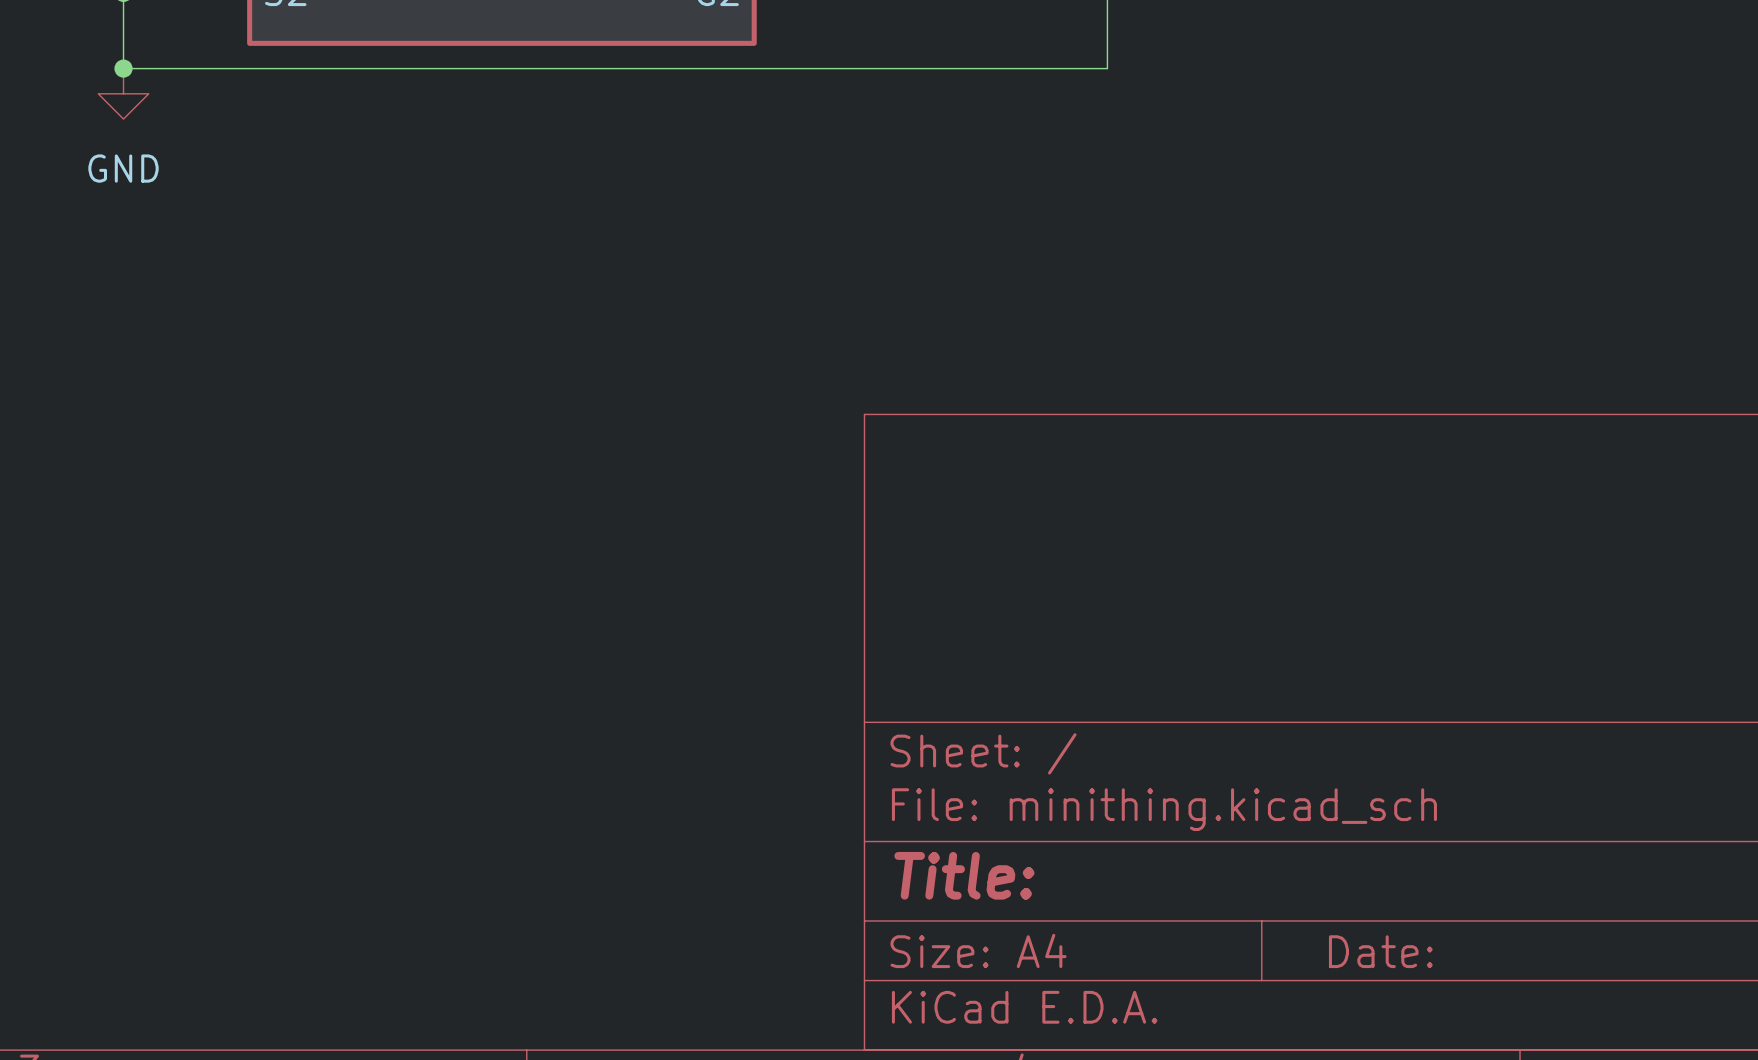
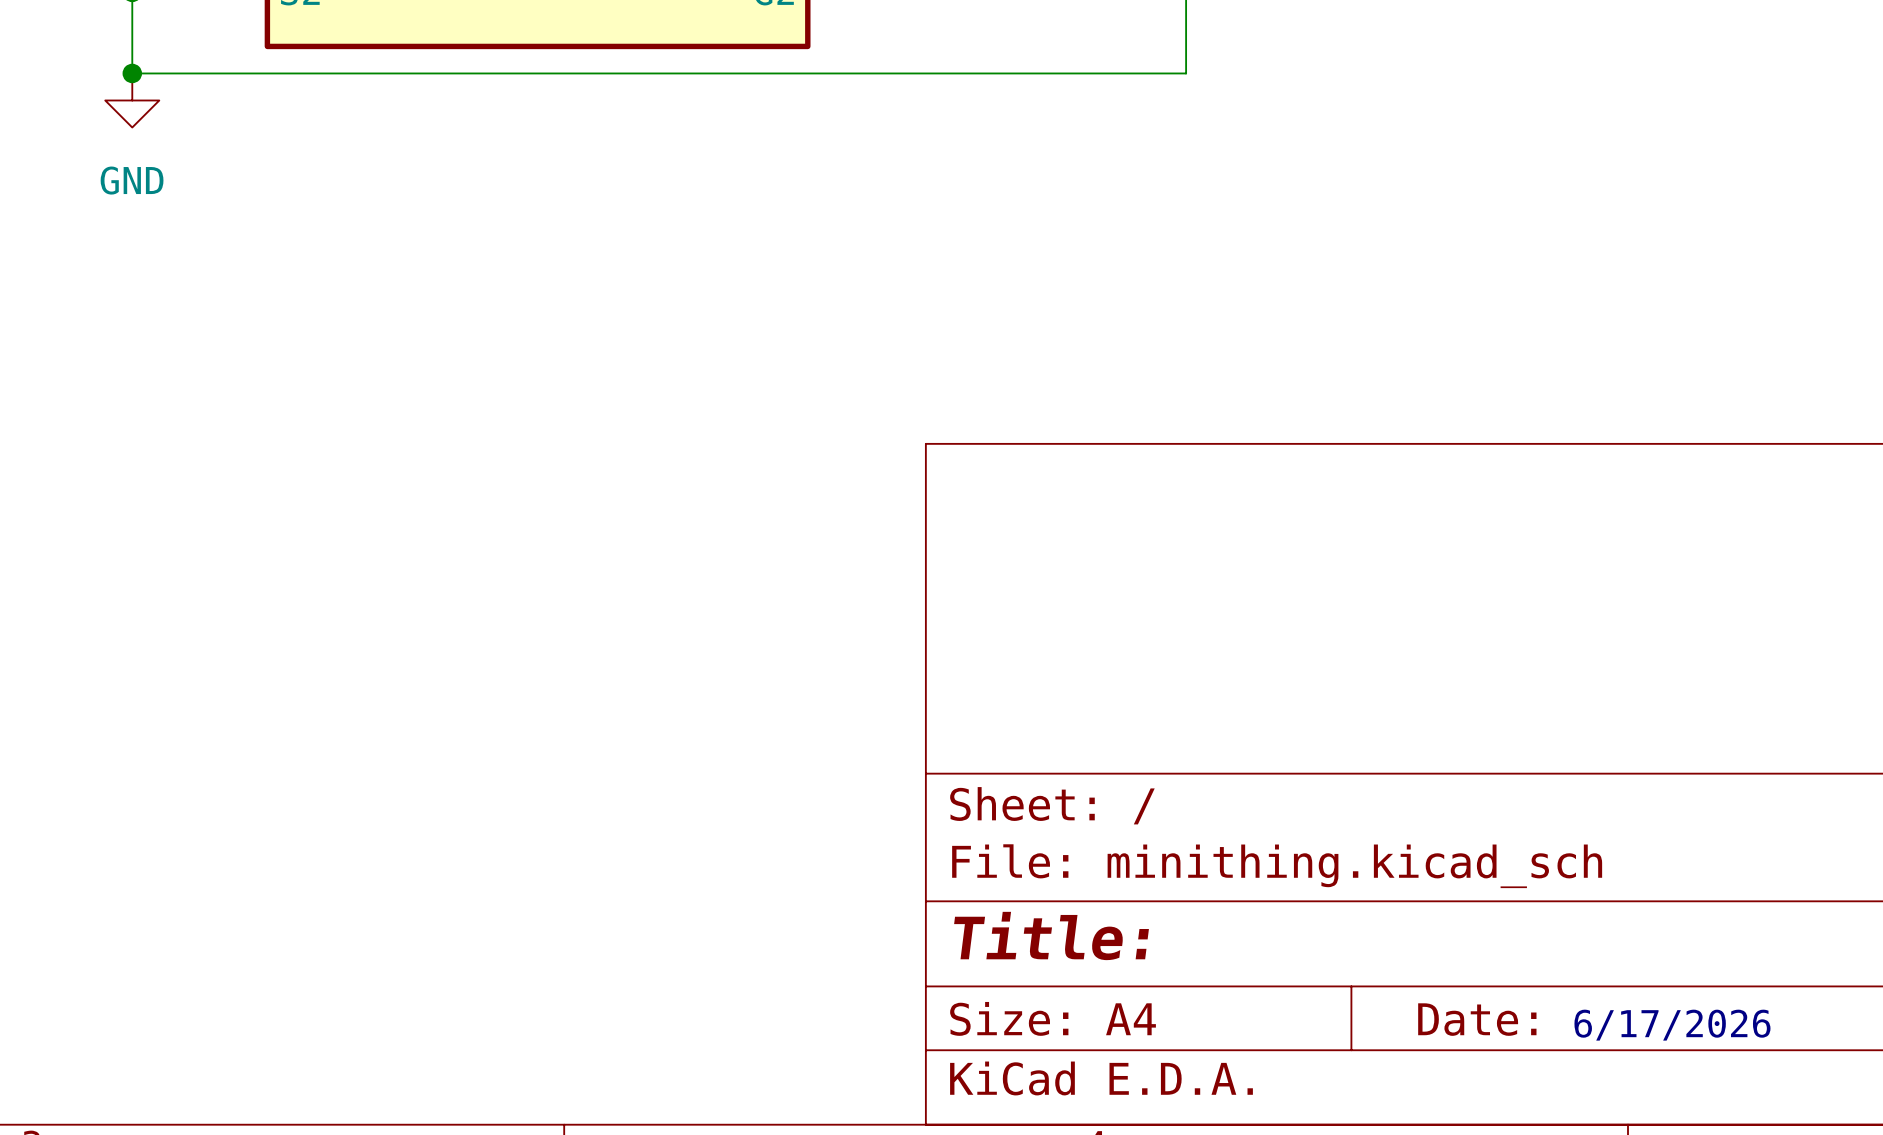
text: none -> 6/17/2026 (1672, 1025)

